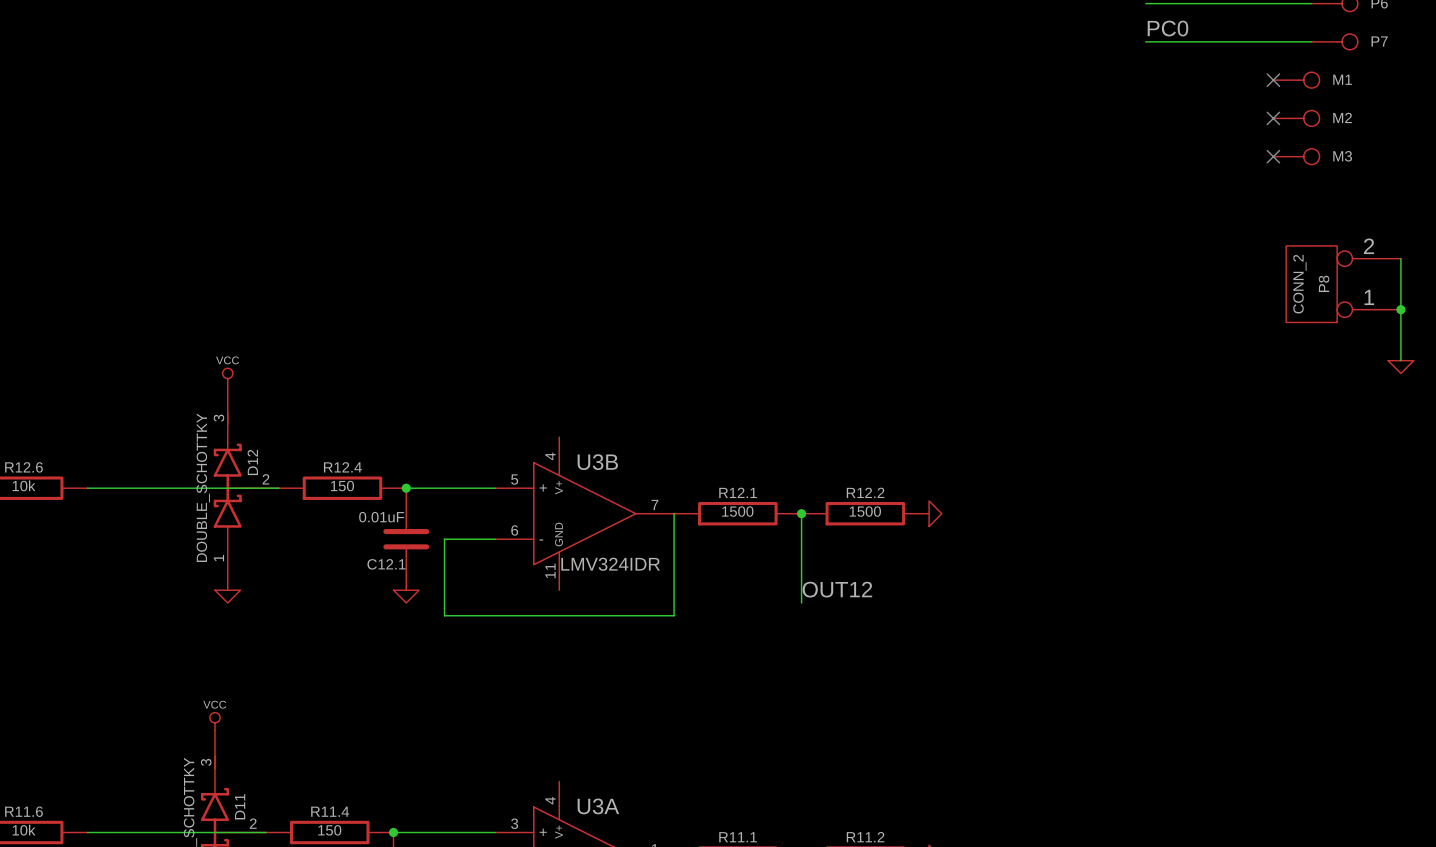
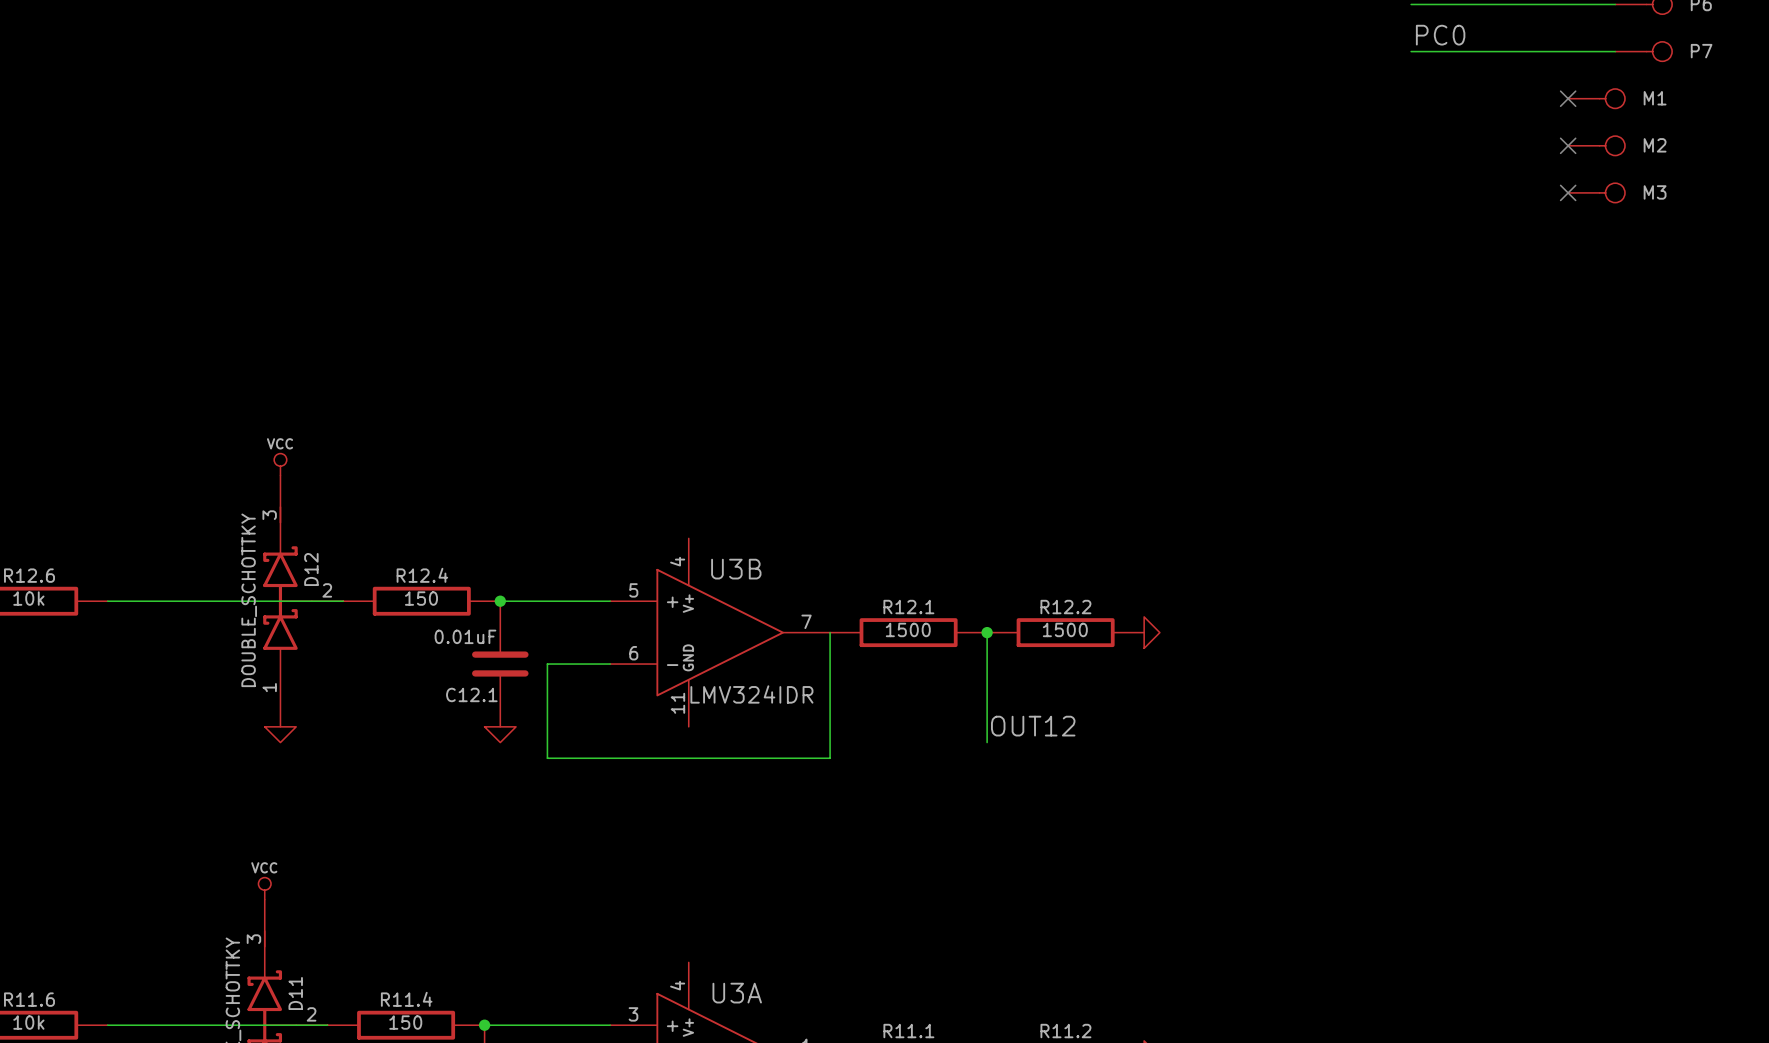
wire: (1400, 258) (1400, 360) -> none
P8: CONN_2 (1343, 284) -> none
junction: (1400, 309) -> none
power symbol: (1400, 367) -> none

